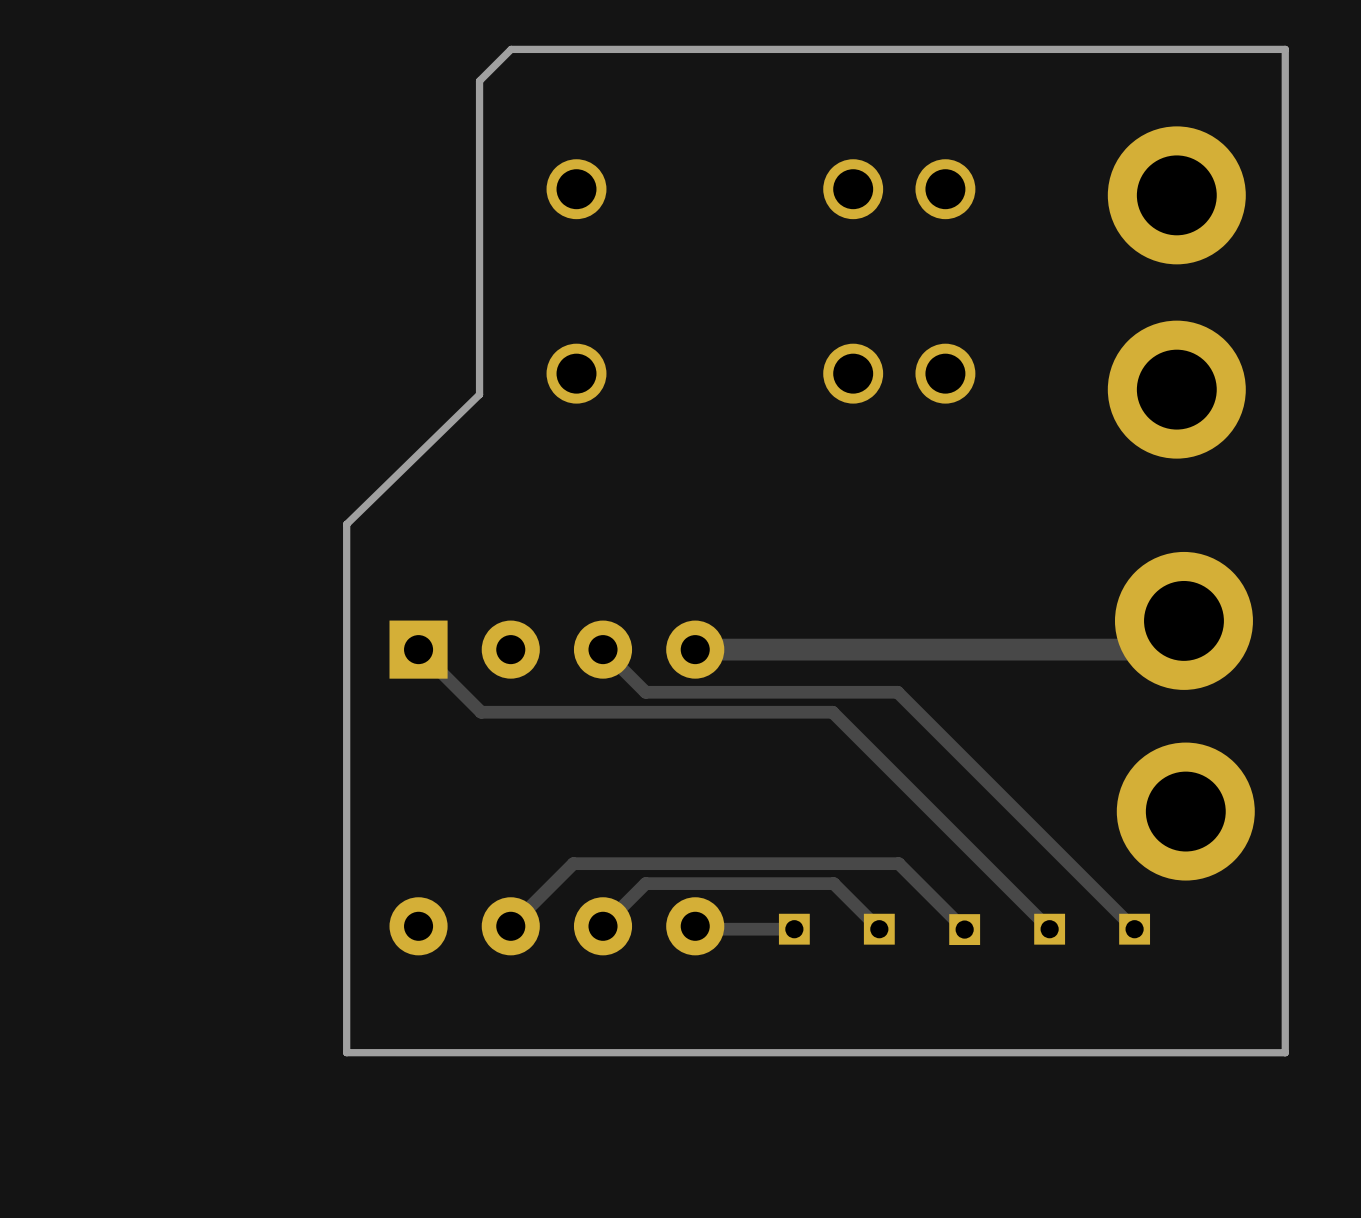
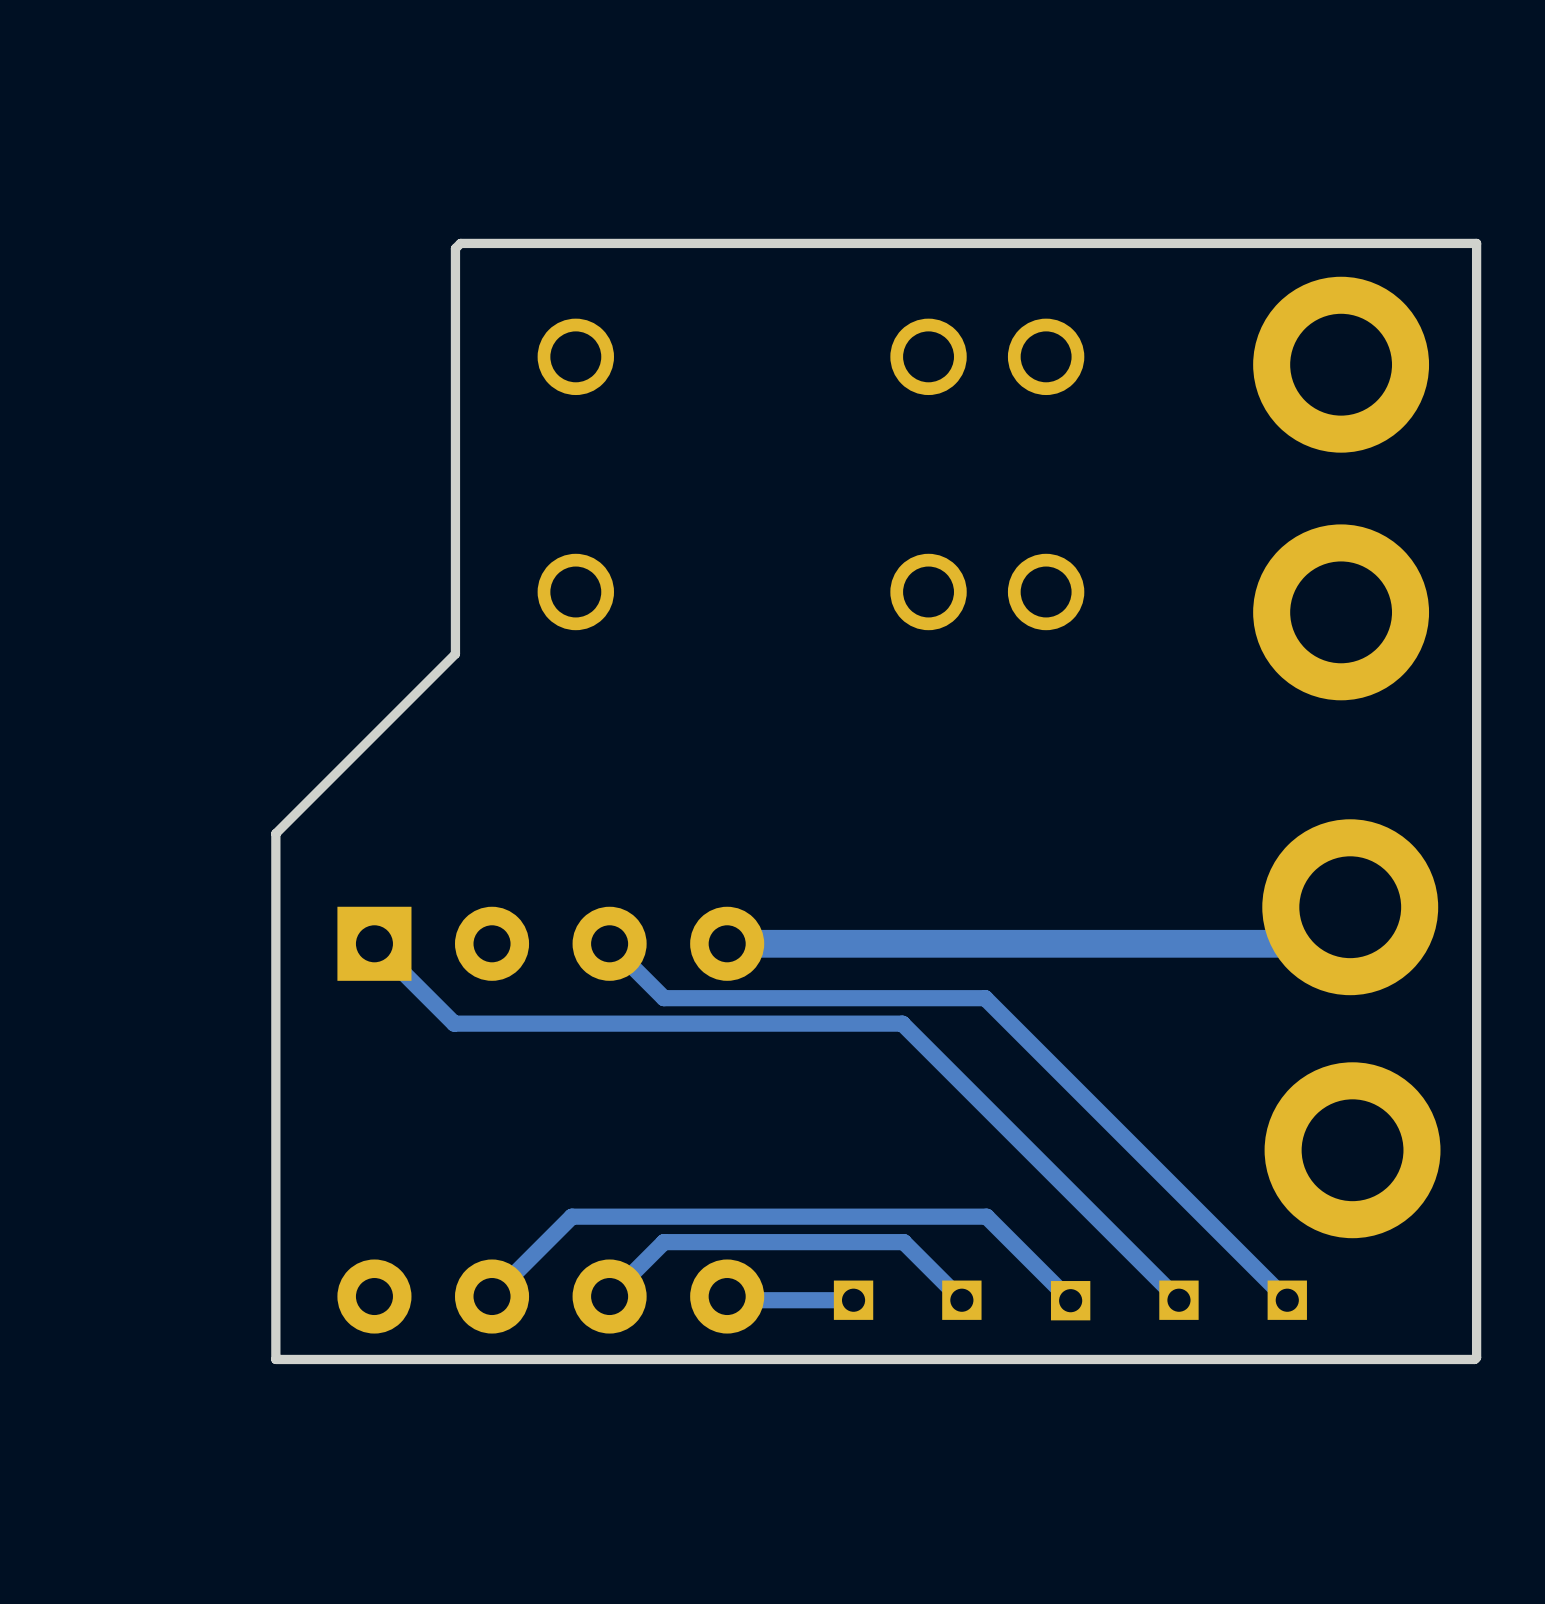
board edge: (1285, 49) (511, 49) (479, 80) (479, 394) (346, 524) (346, 1052) (1285, 1052) (1285, 49) -> (1476, 243) (1476, 1357) (1474, 1359) (275, 1359) (275, 833) (455, 654) (455, 248) (460, 243) (1476, 243)

